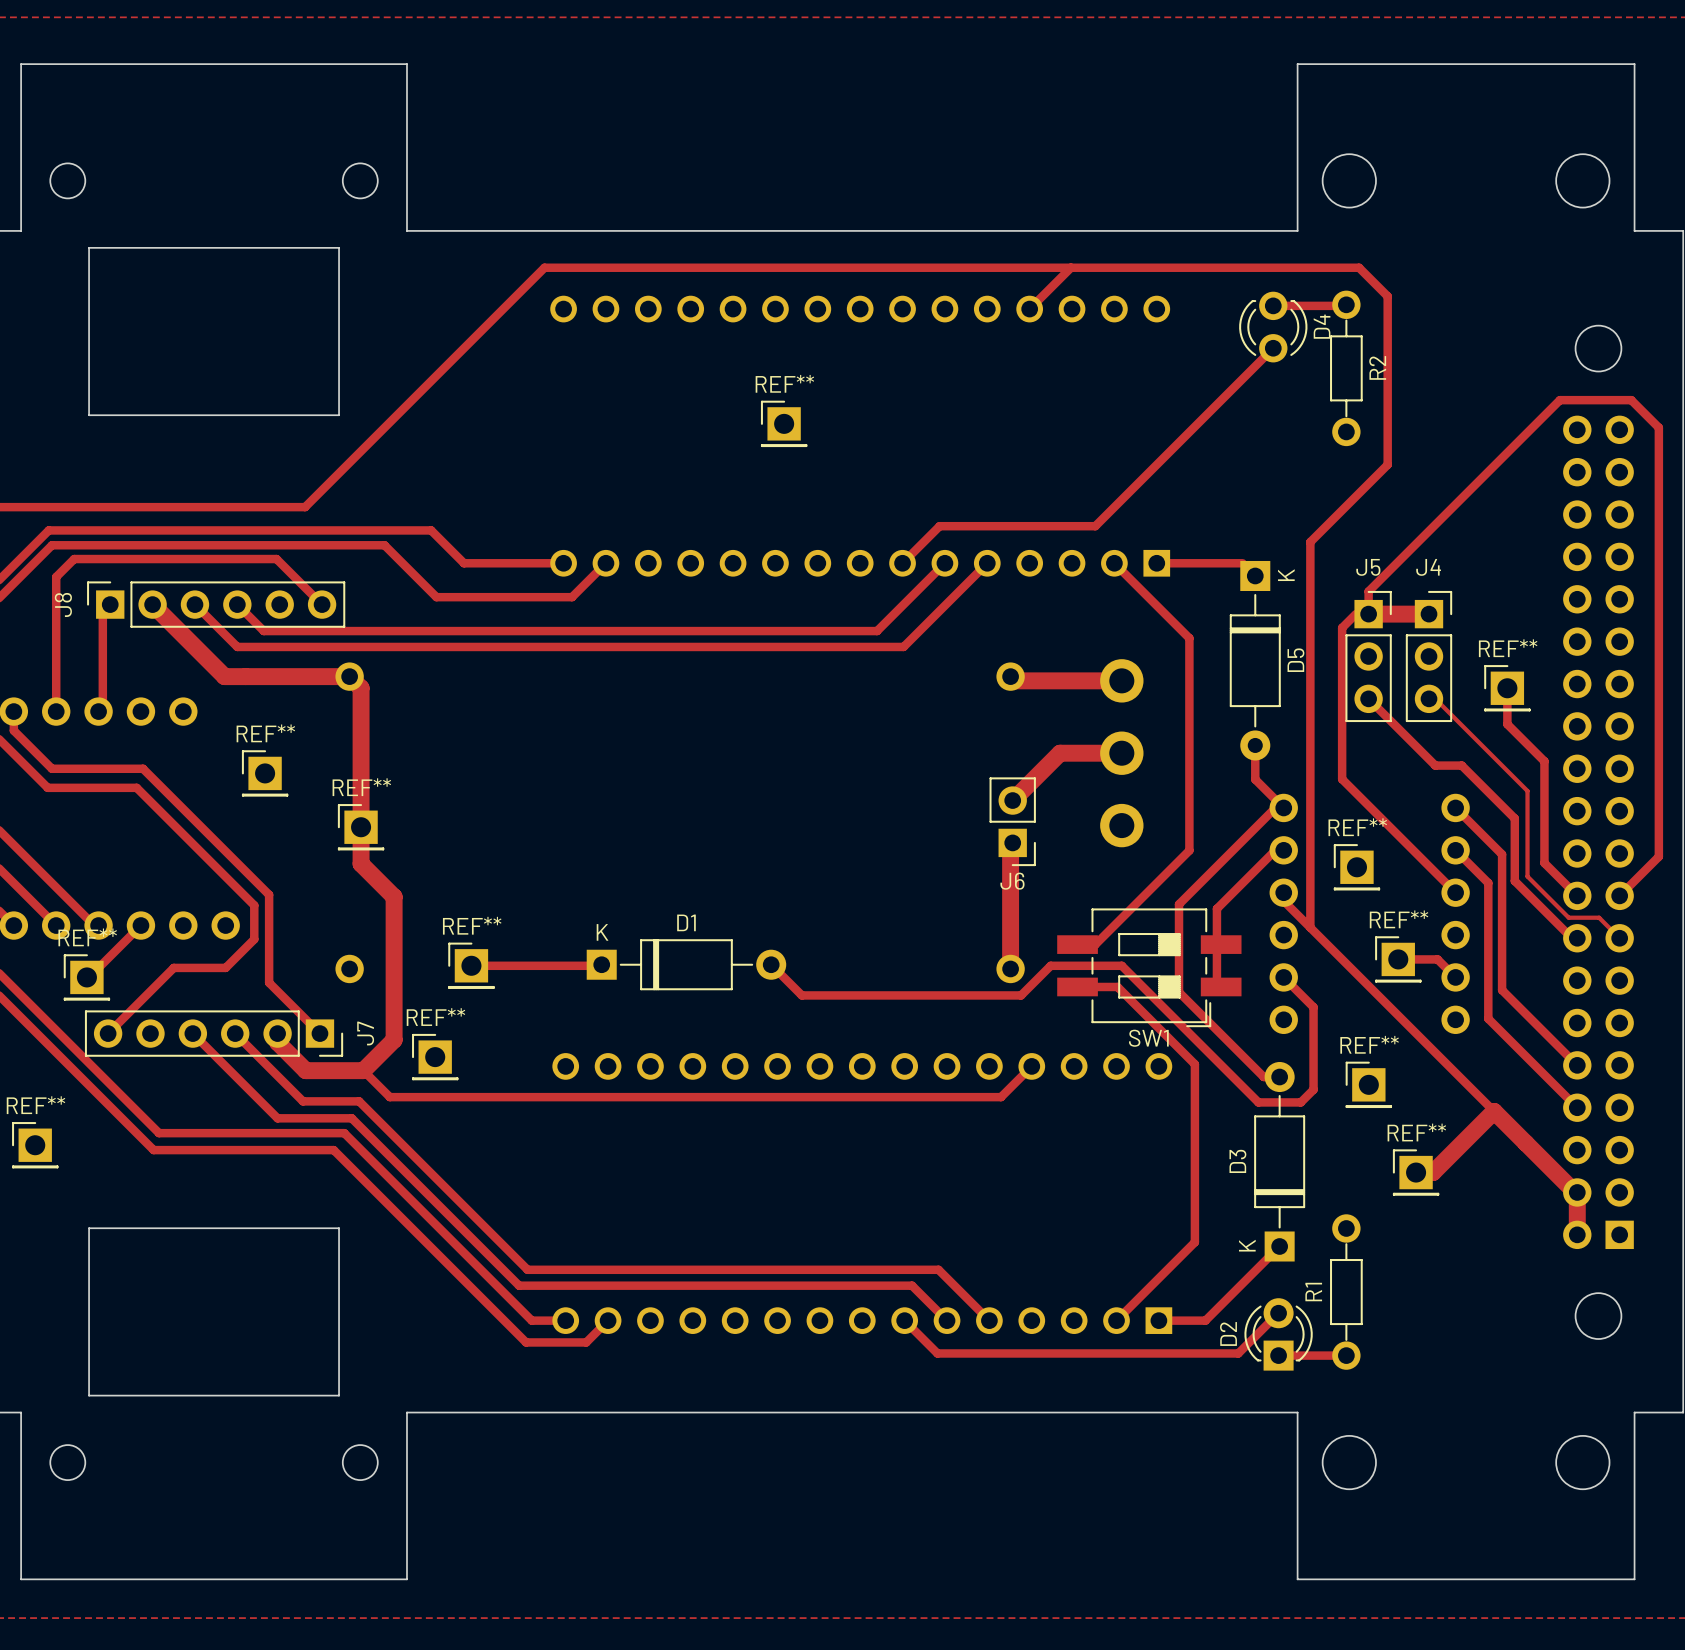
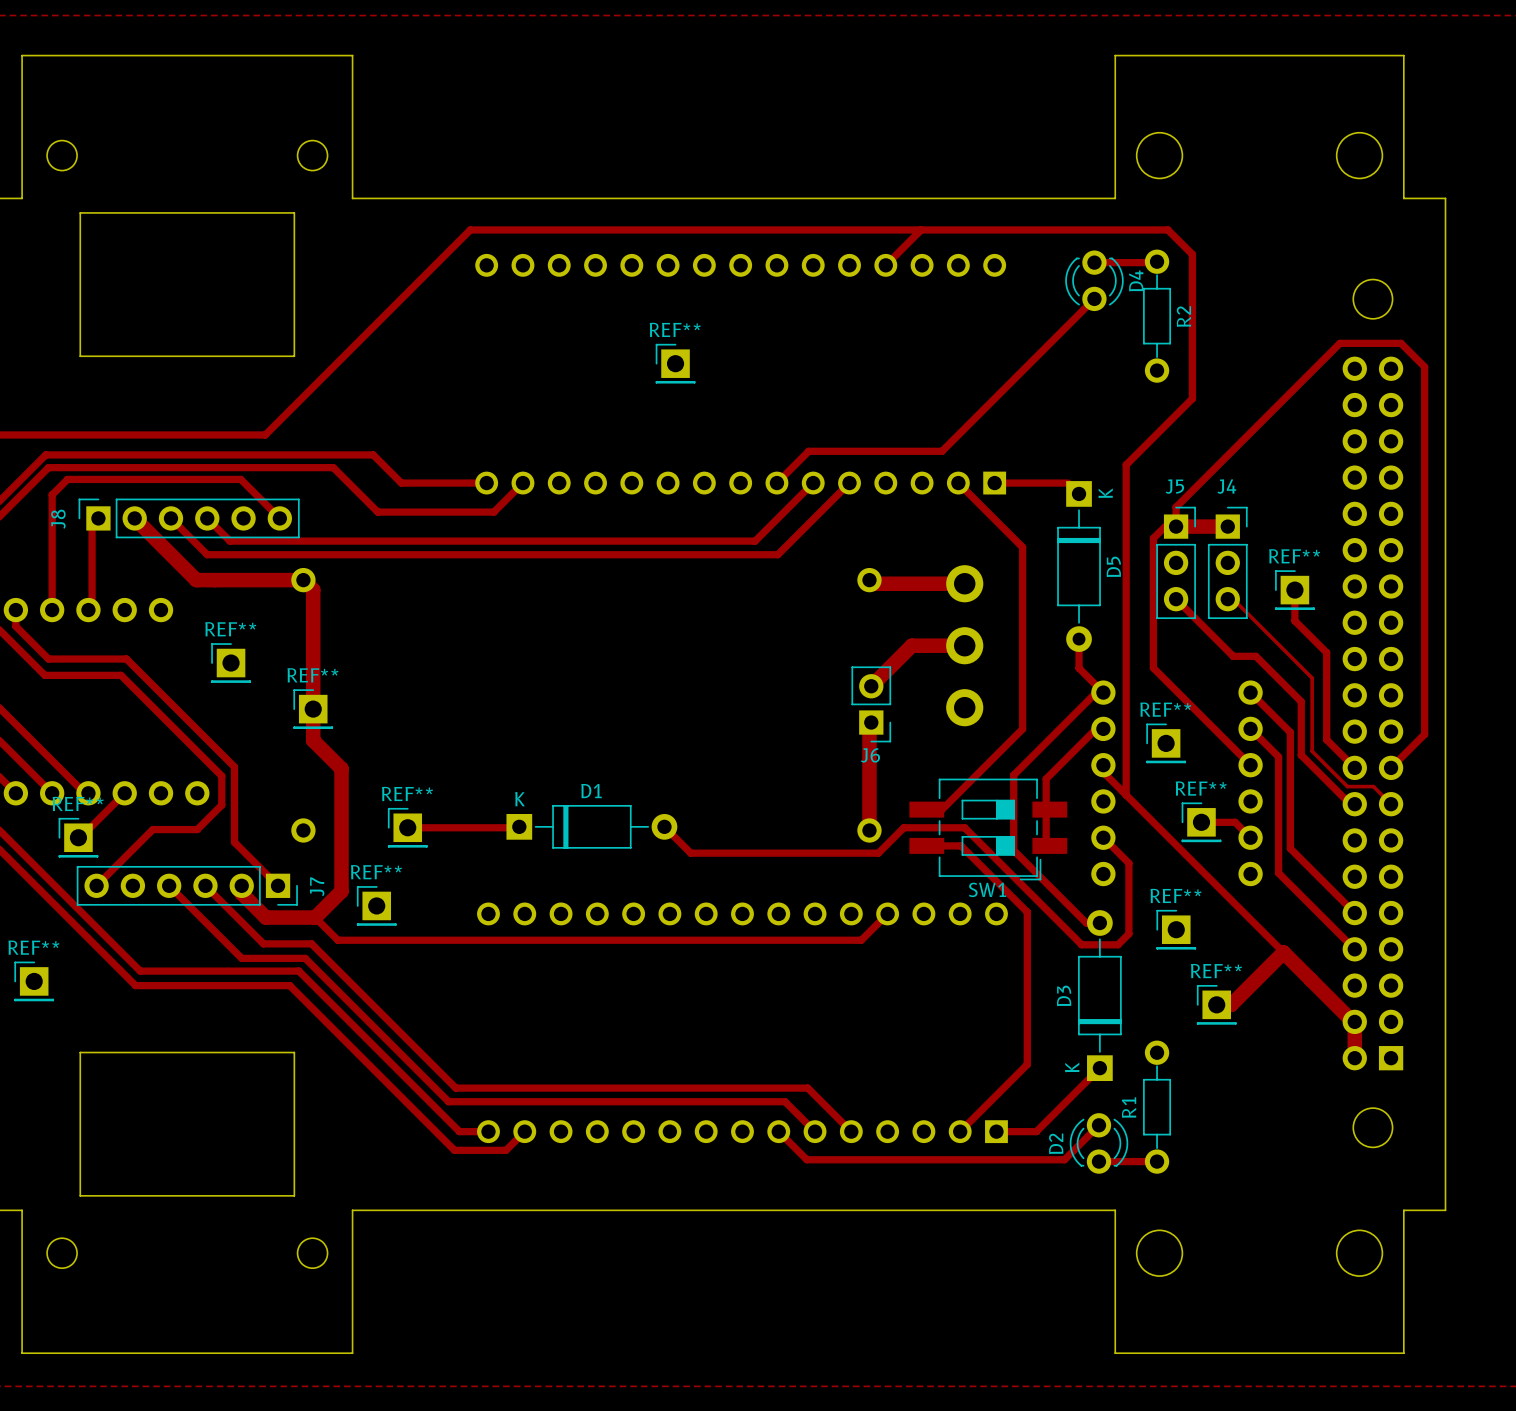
D2 footprint: [1244, 1298, 1313, 1371] -> [1069, 1113, 1129, 1174]

